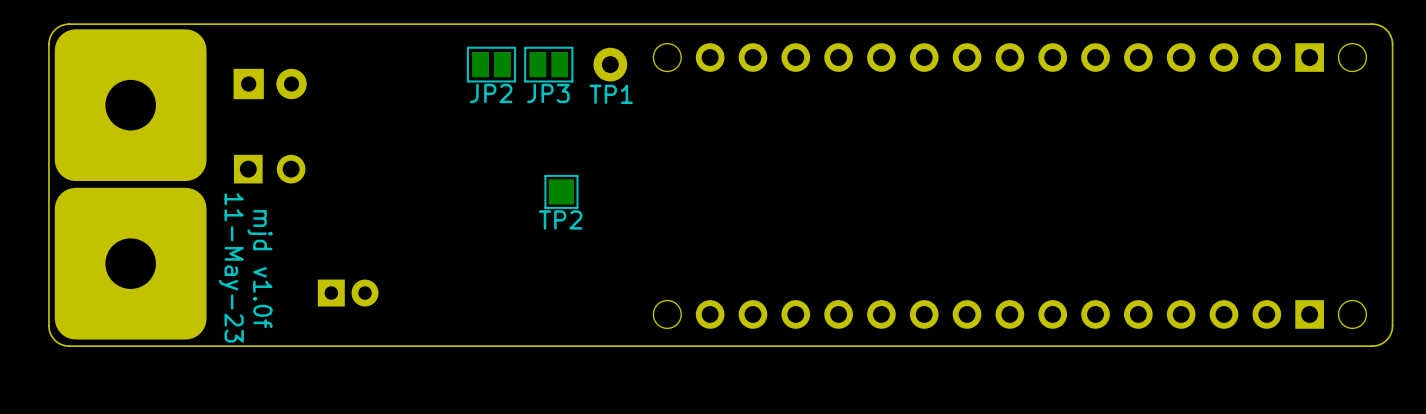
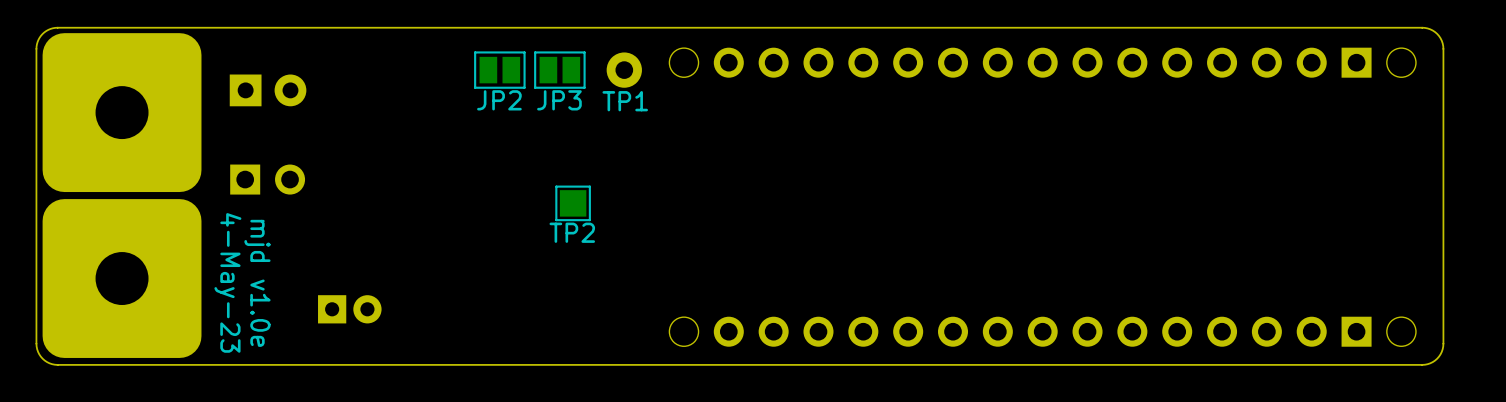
text: 11-May-23 (231, 267) -> 4-May-23 (227, 282)
text: mjd v1.0f (260, 269) -> mjd v1.0e (257, 283)

